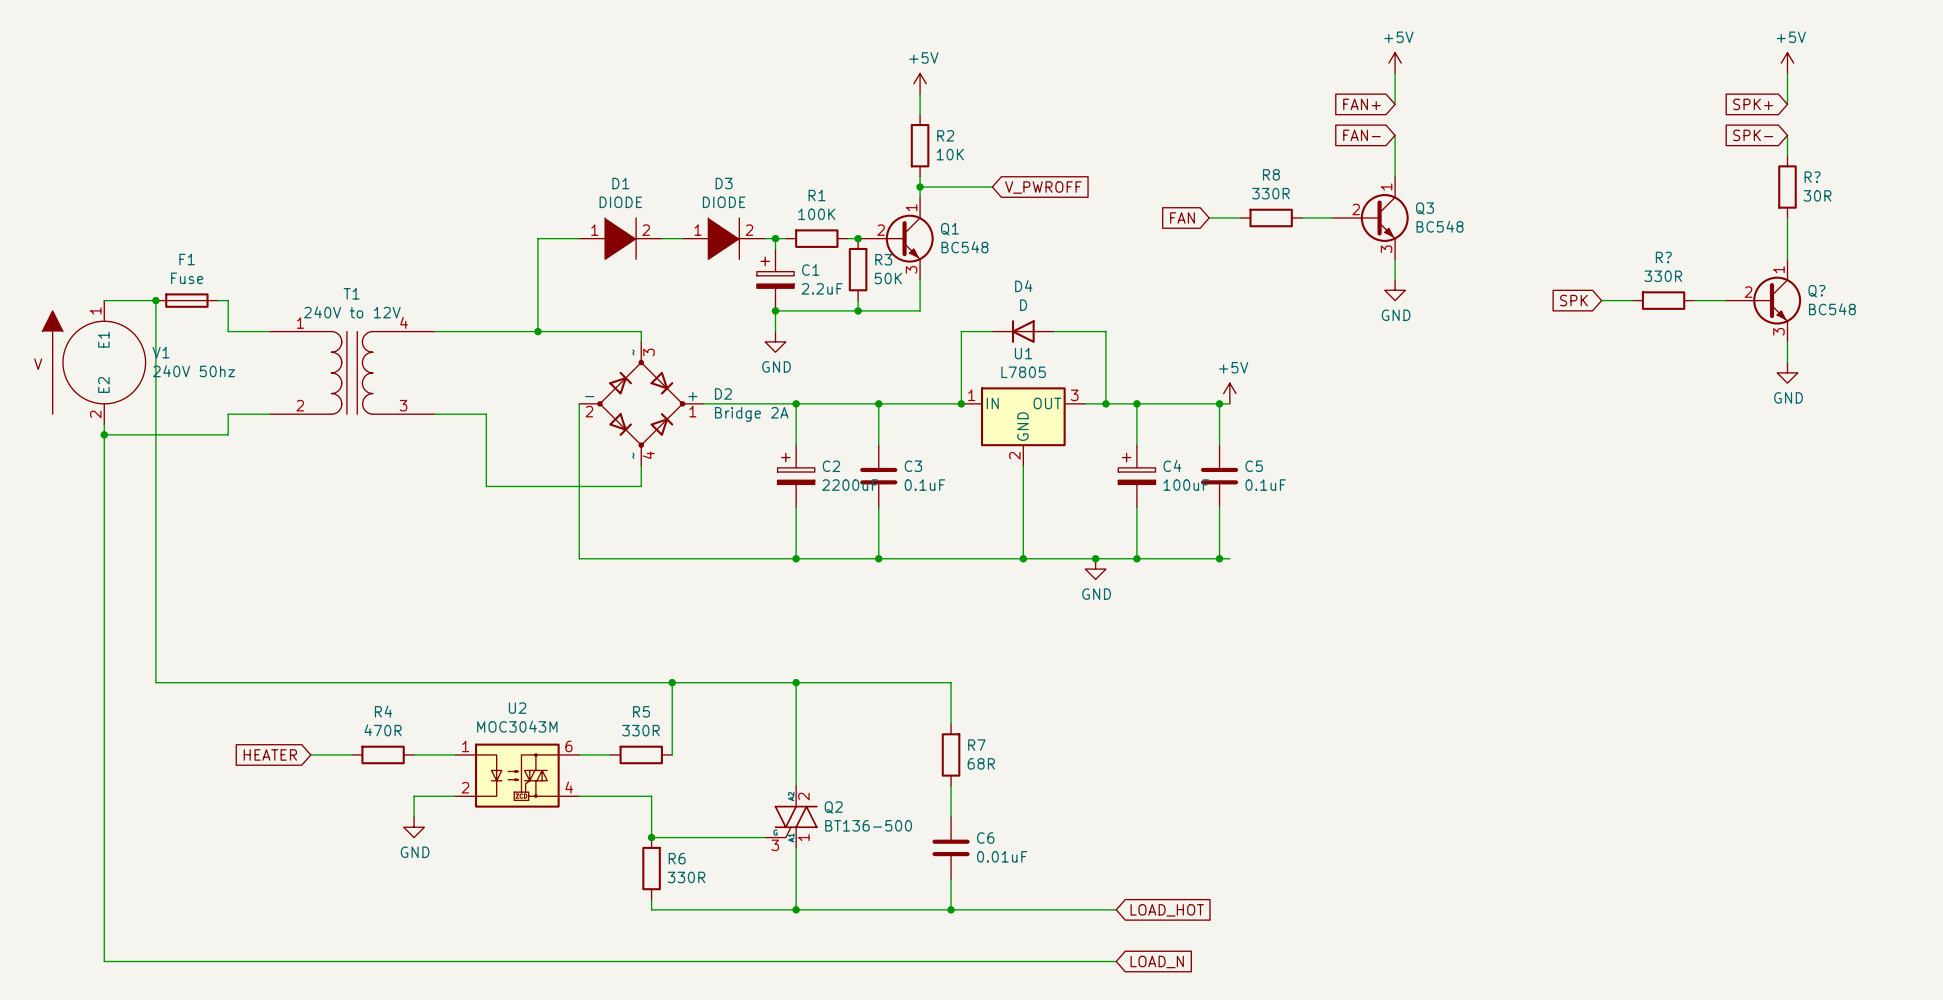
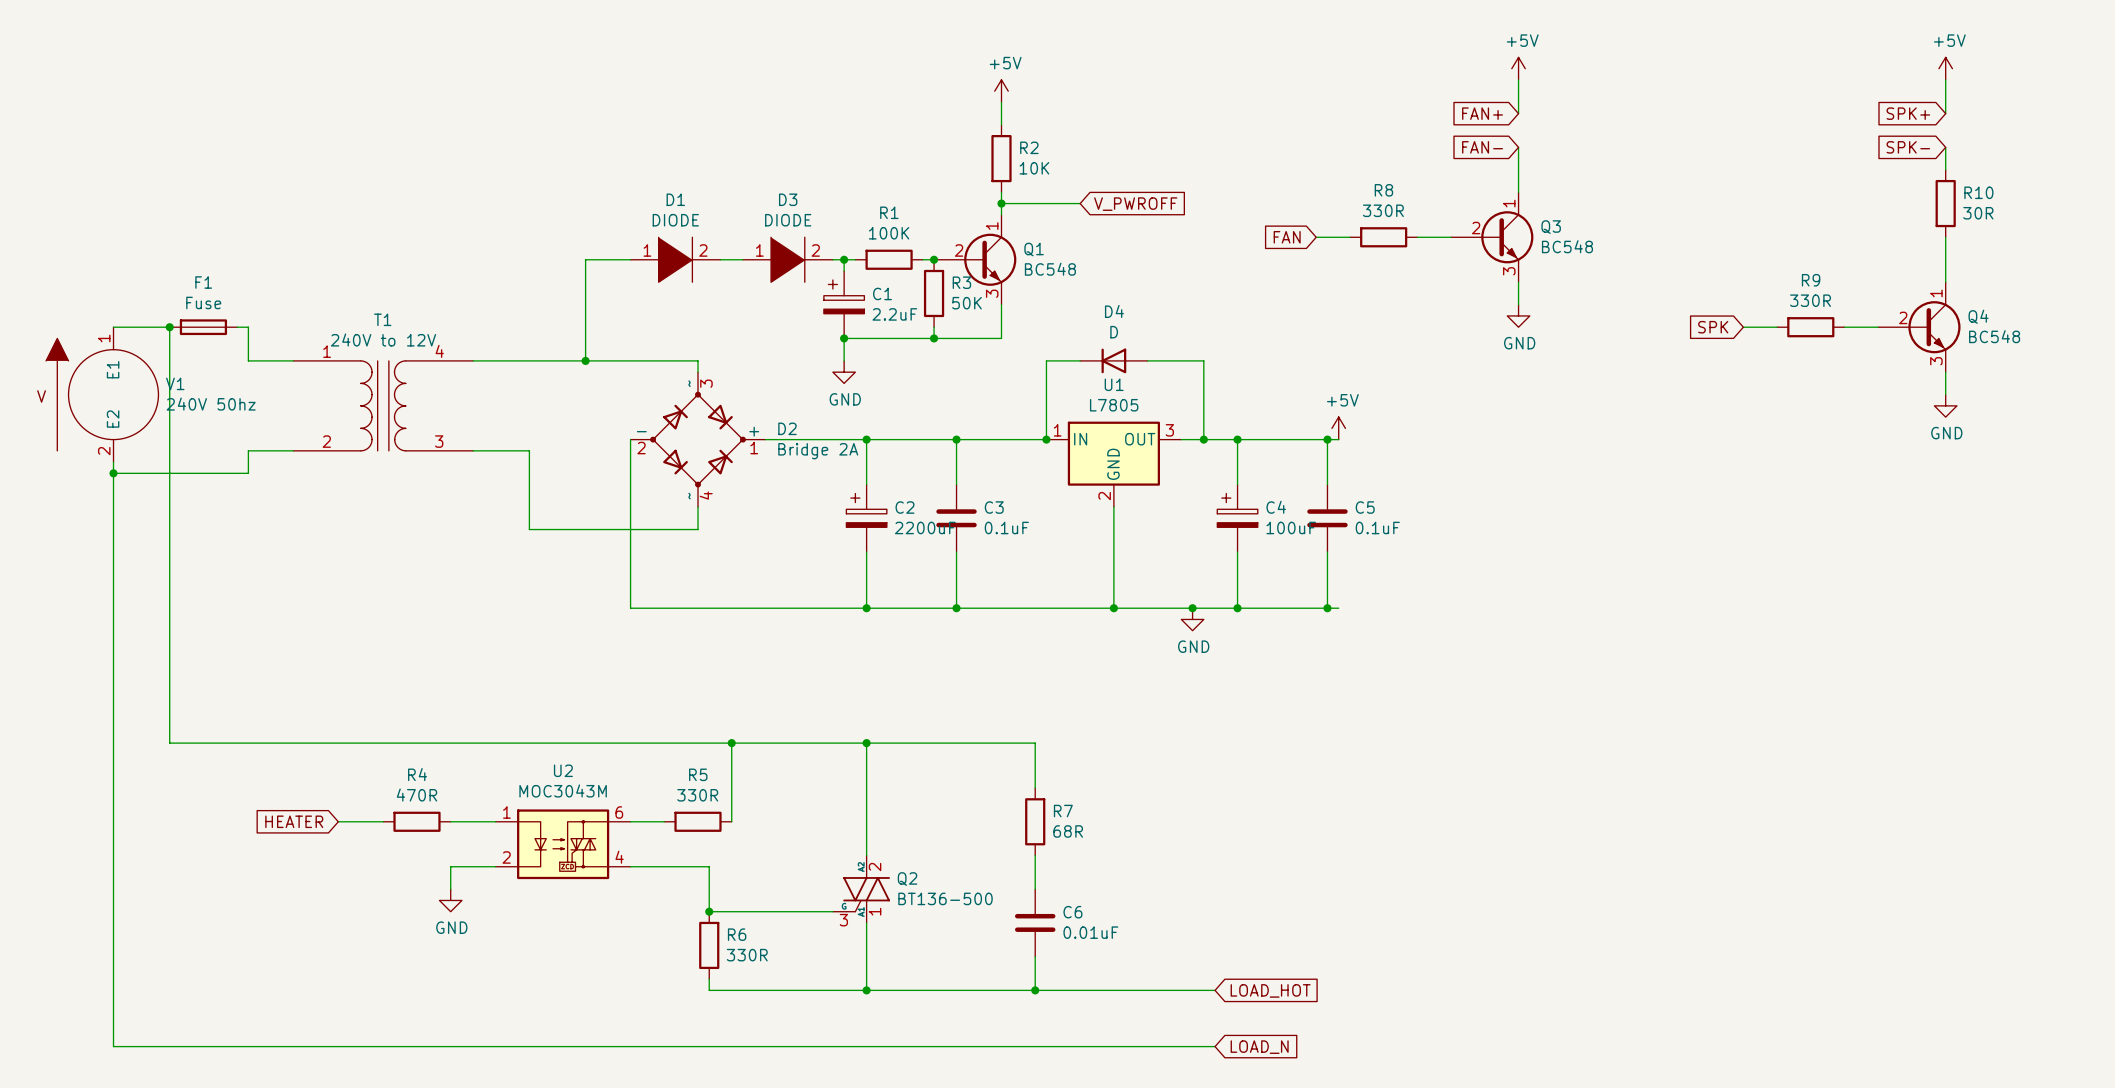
R? name: R? (1812, 177) -> R10 (1978, 192)
R? name: R? (1663, 257) -> R9 (1811, 280)
Q? name: Q? (1816, 291) -> Q4 (1978, 316)

